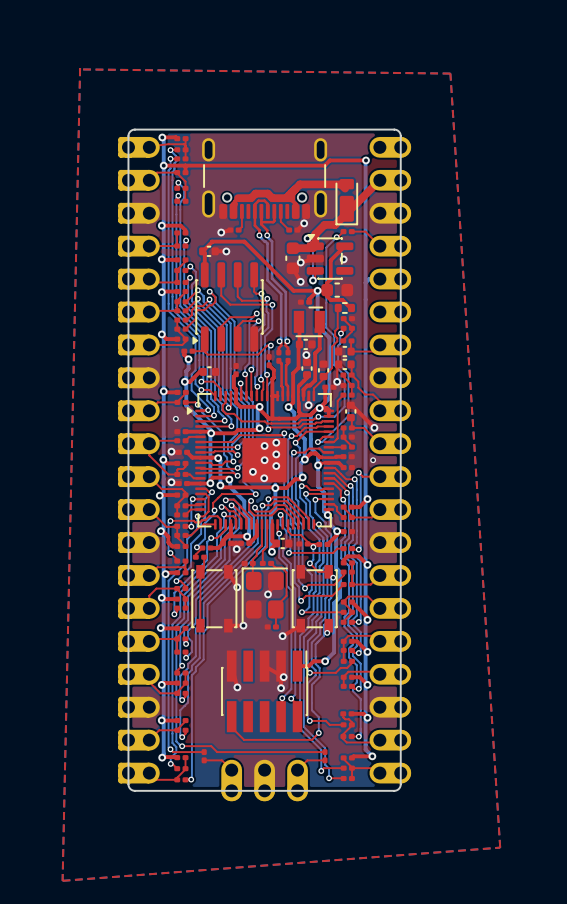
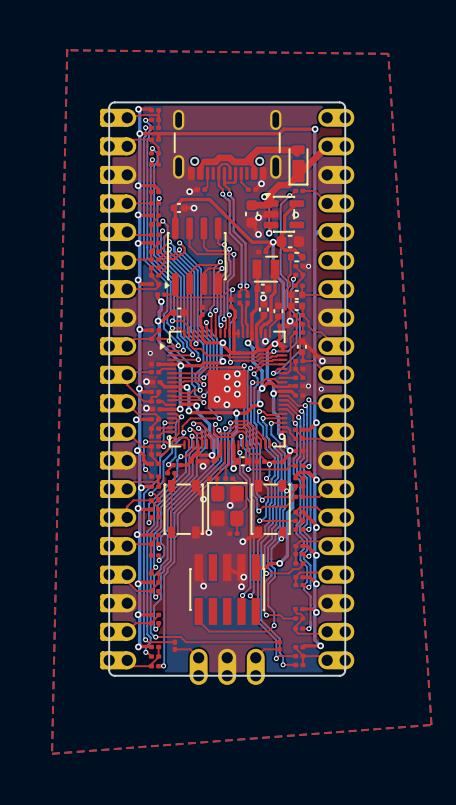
via: none -> (308, 266)
via: none -> (308, 386)

